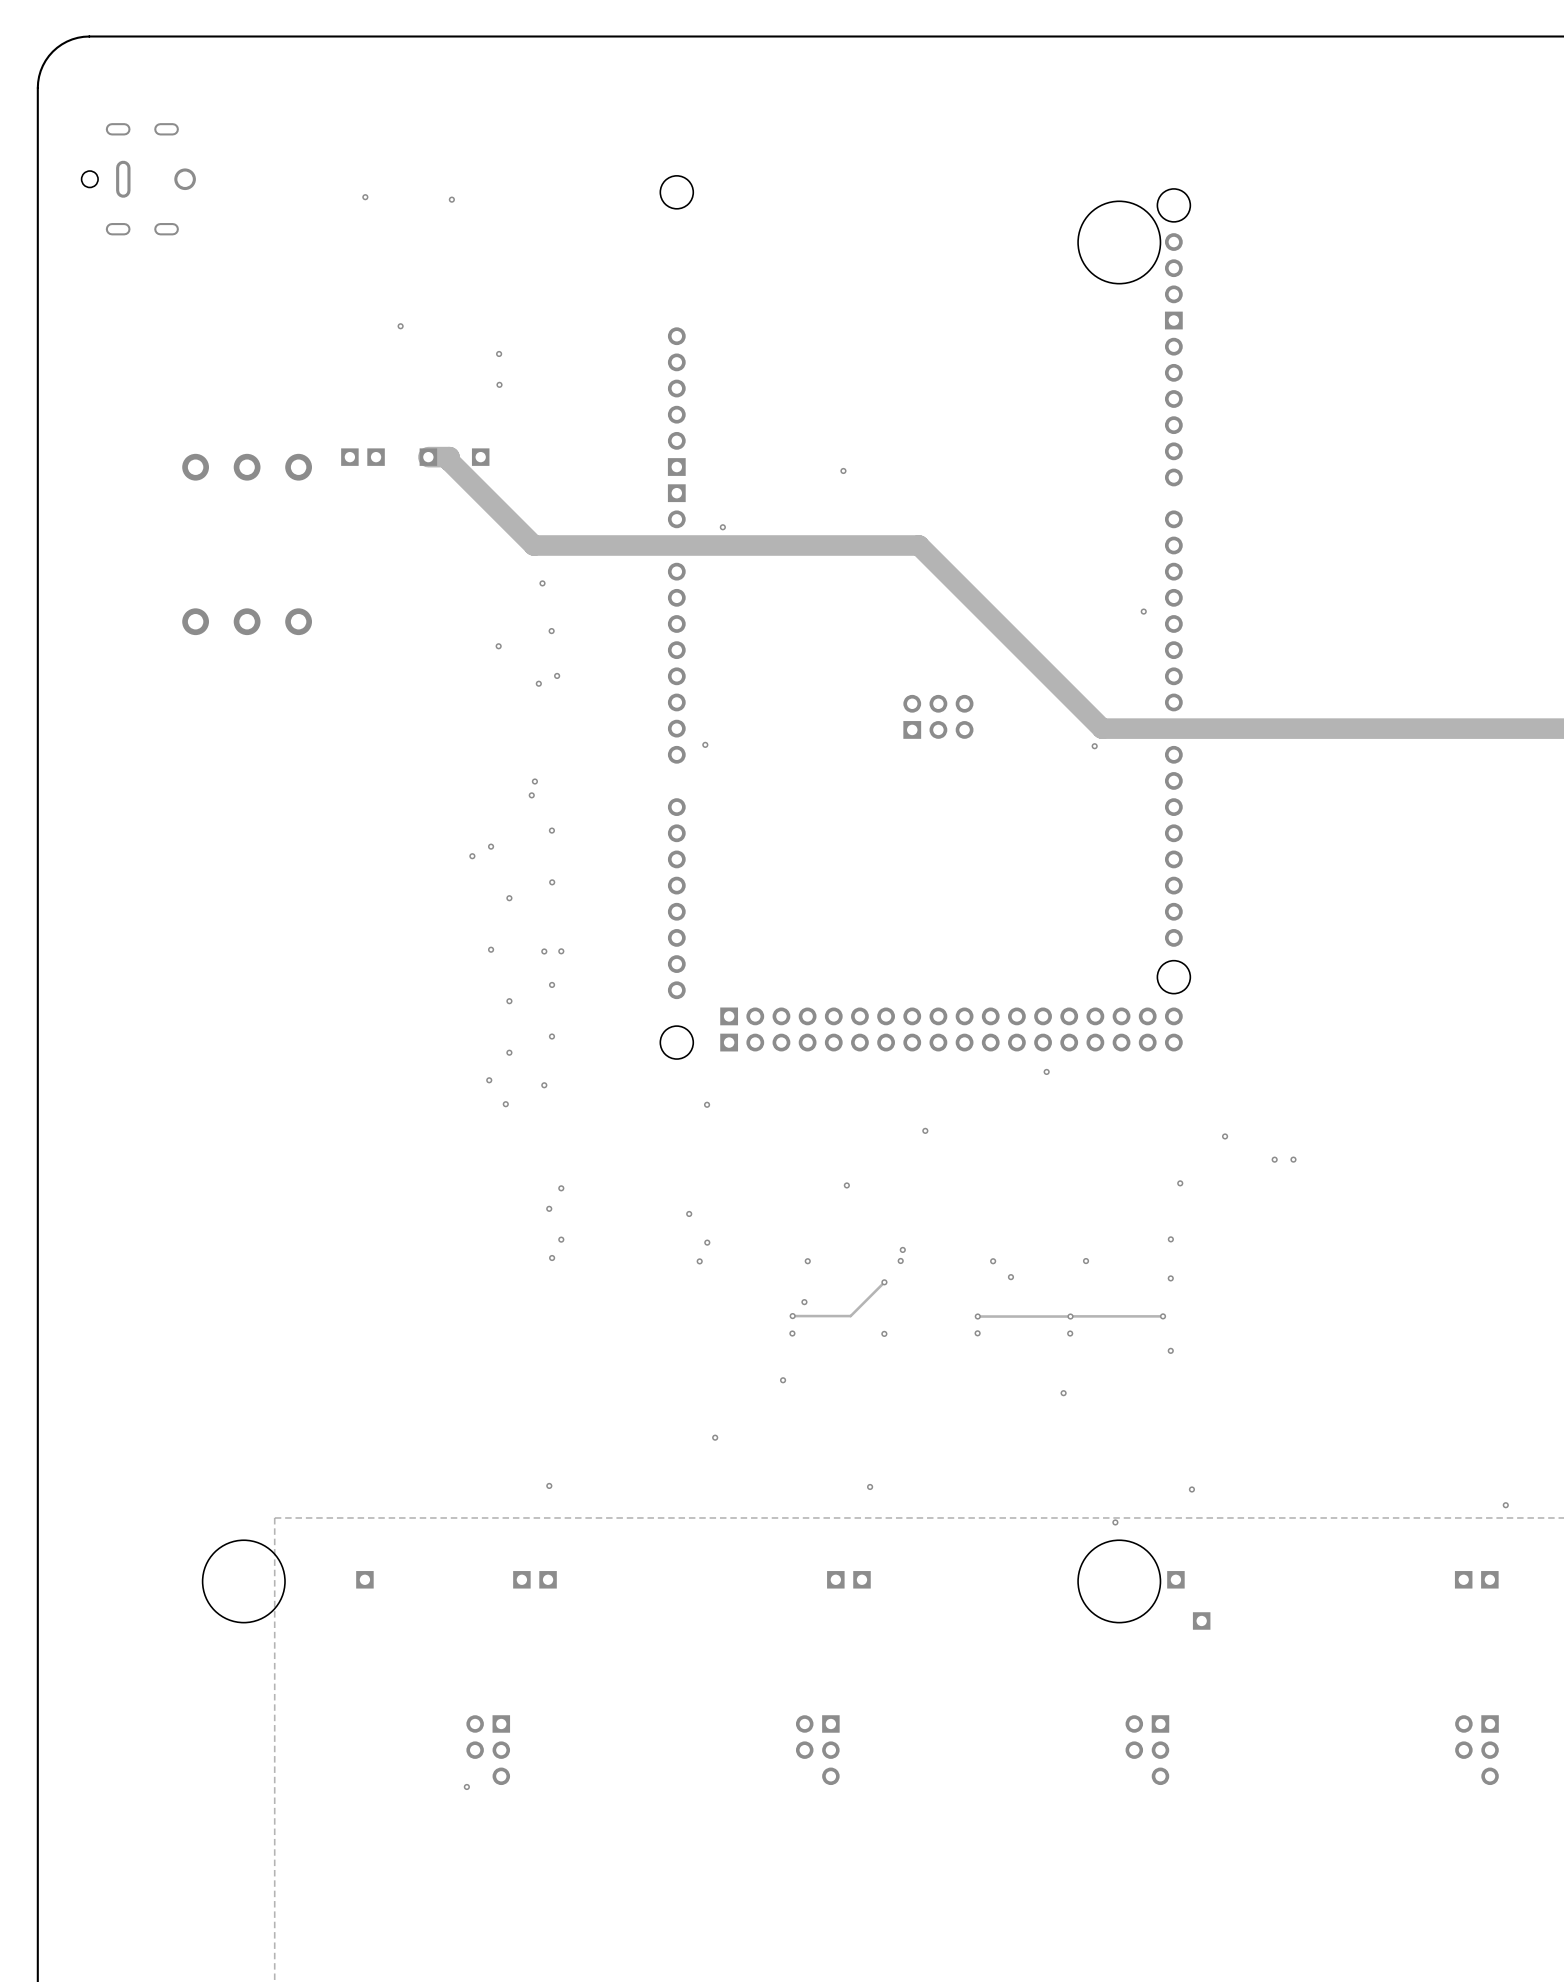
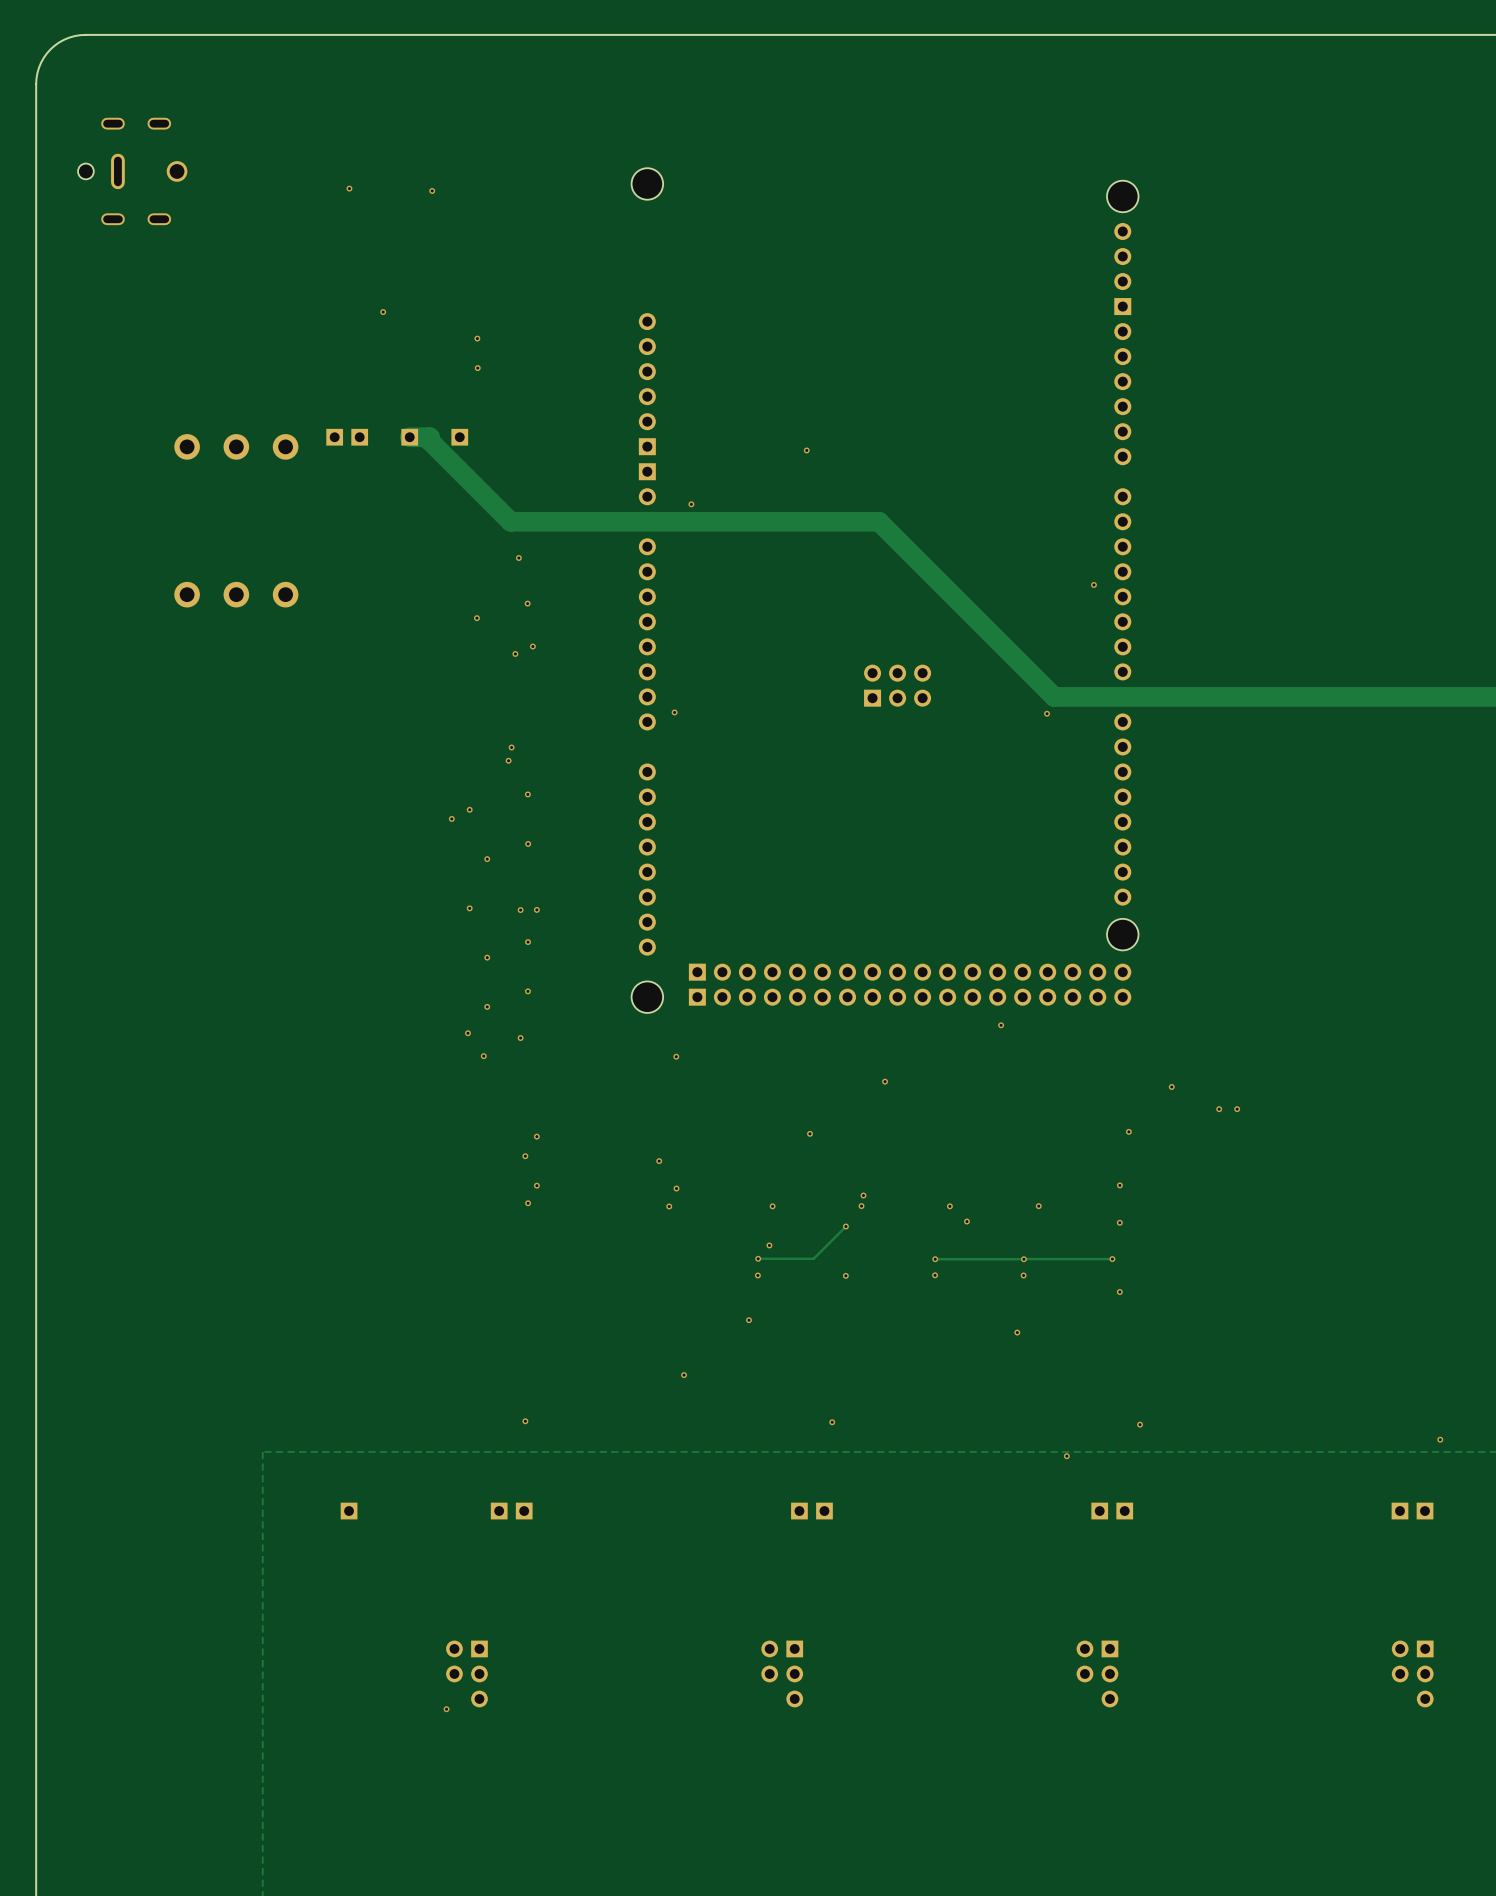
round board edge: [1077, 200, 1161, 285] -> none
round board edge: [202, 1539, 286, 1624] -> none
round board edge: [1077, 1539, 1161, 1624] -> none
part position: (1201, 1620) -> (1099, 1511)

